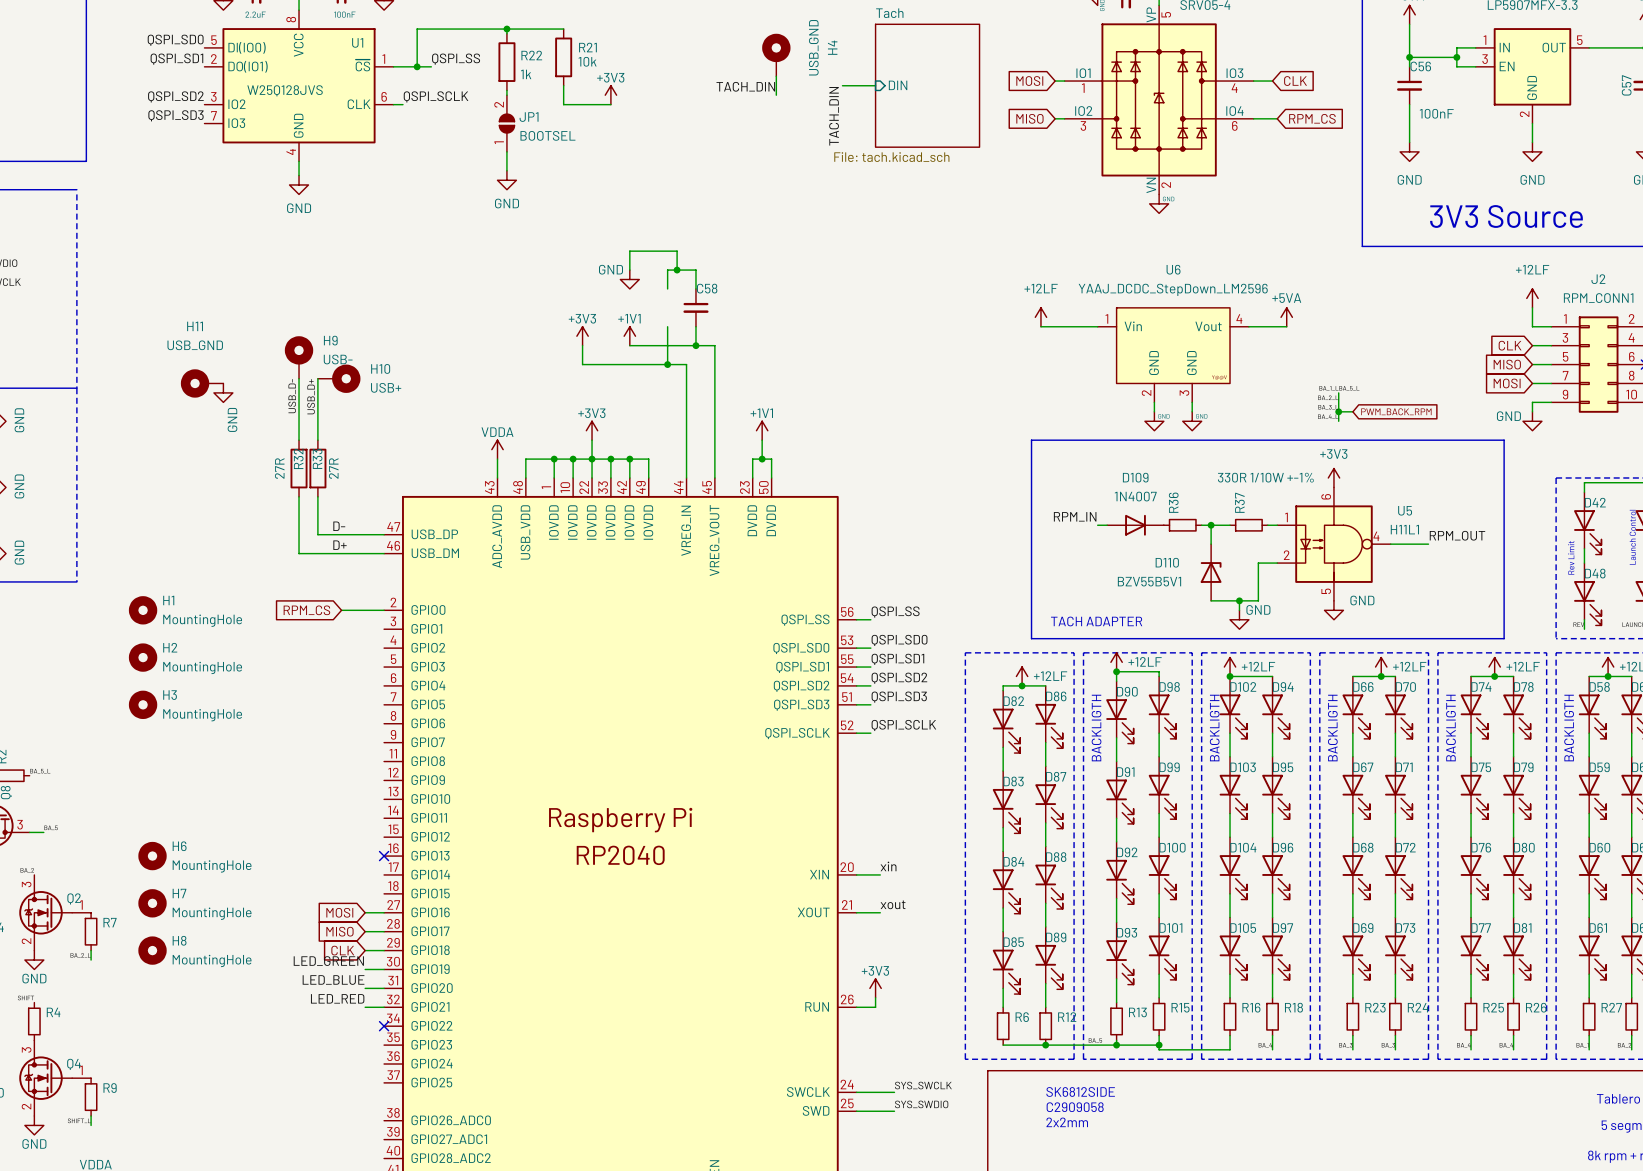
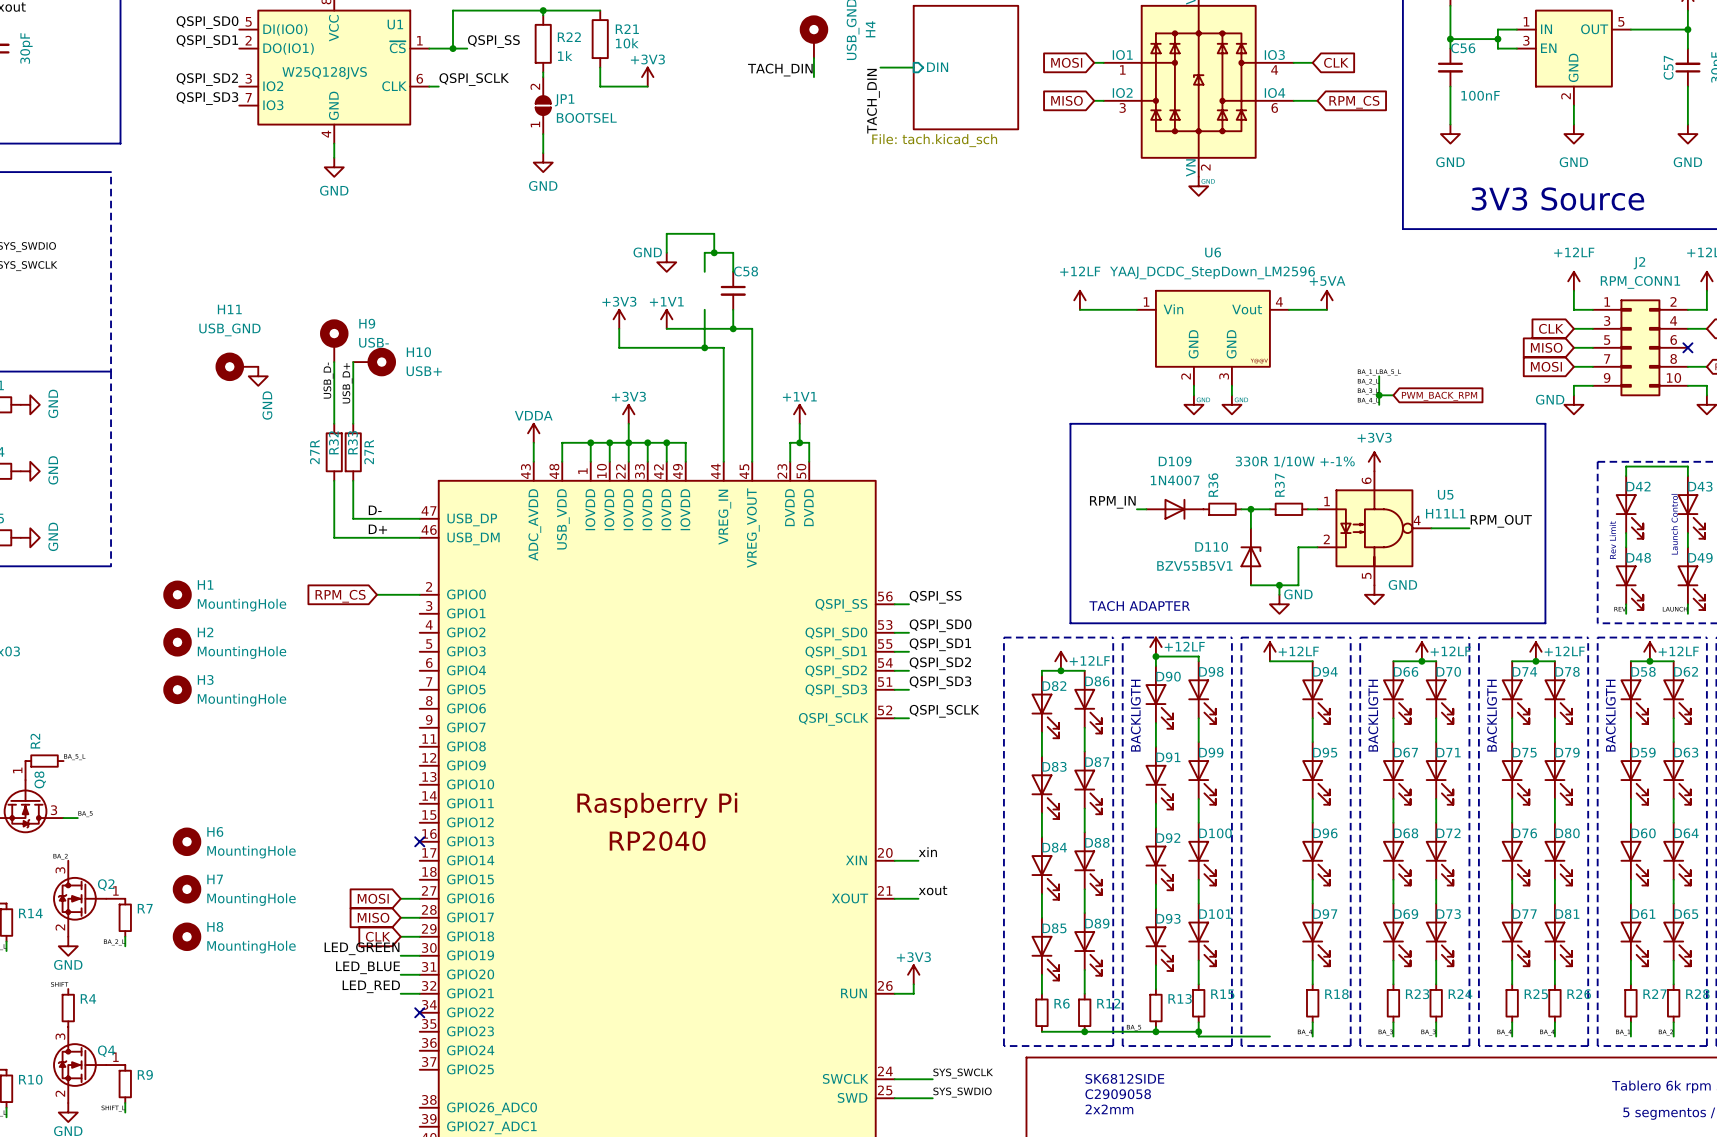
junction: (1230, 676) -> none
D102: (1233, 707) -> none
text: BACKLIGTH (1214, 728) -> none
wire: (1230, 733) (1230, 756) -> none
D103: (1233, 788) -> none
wire: (1230, 813) (1230, 837) -> none
D104: (1233, 868) -> none
wire: (1230, 893) (1230, 917) -> none
D105: (1233, 948) -> none
wire: (1230, 974) (1230, 997) -> none
R16: (1230, 1016) -> none
wire: (1230, 1035) (1230, 1049) -> none

